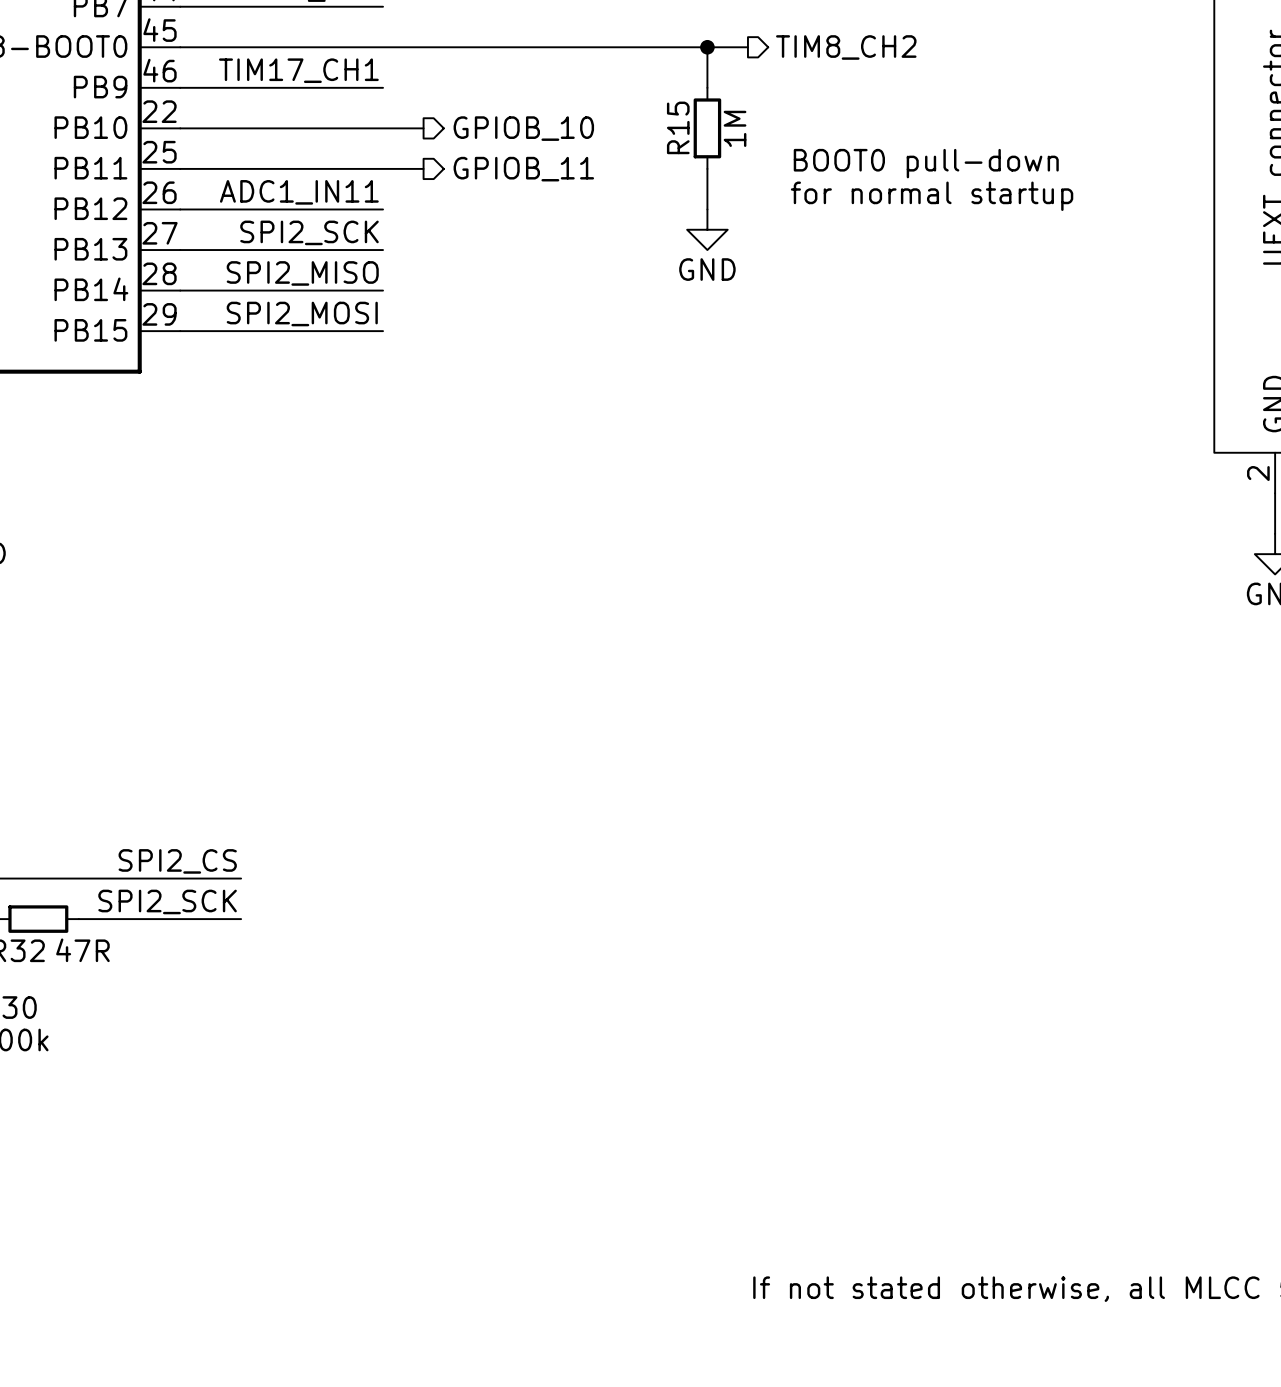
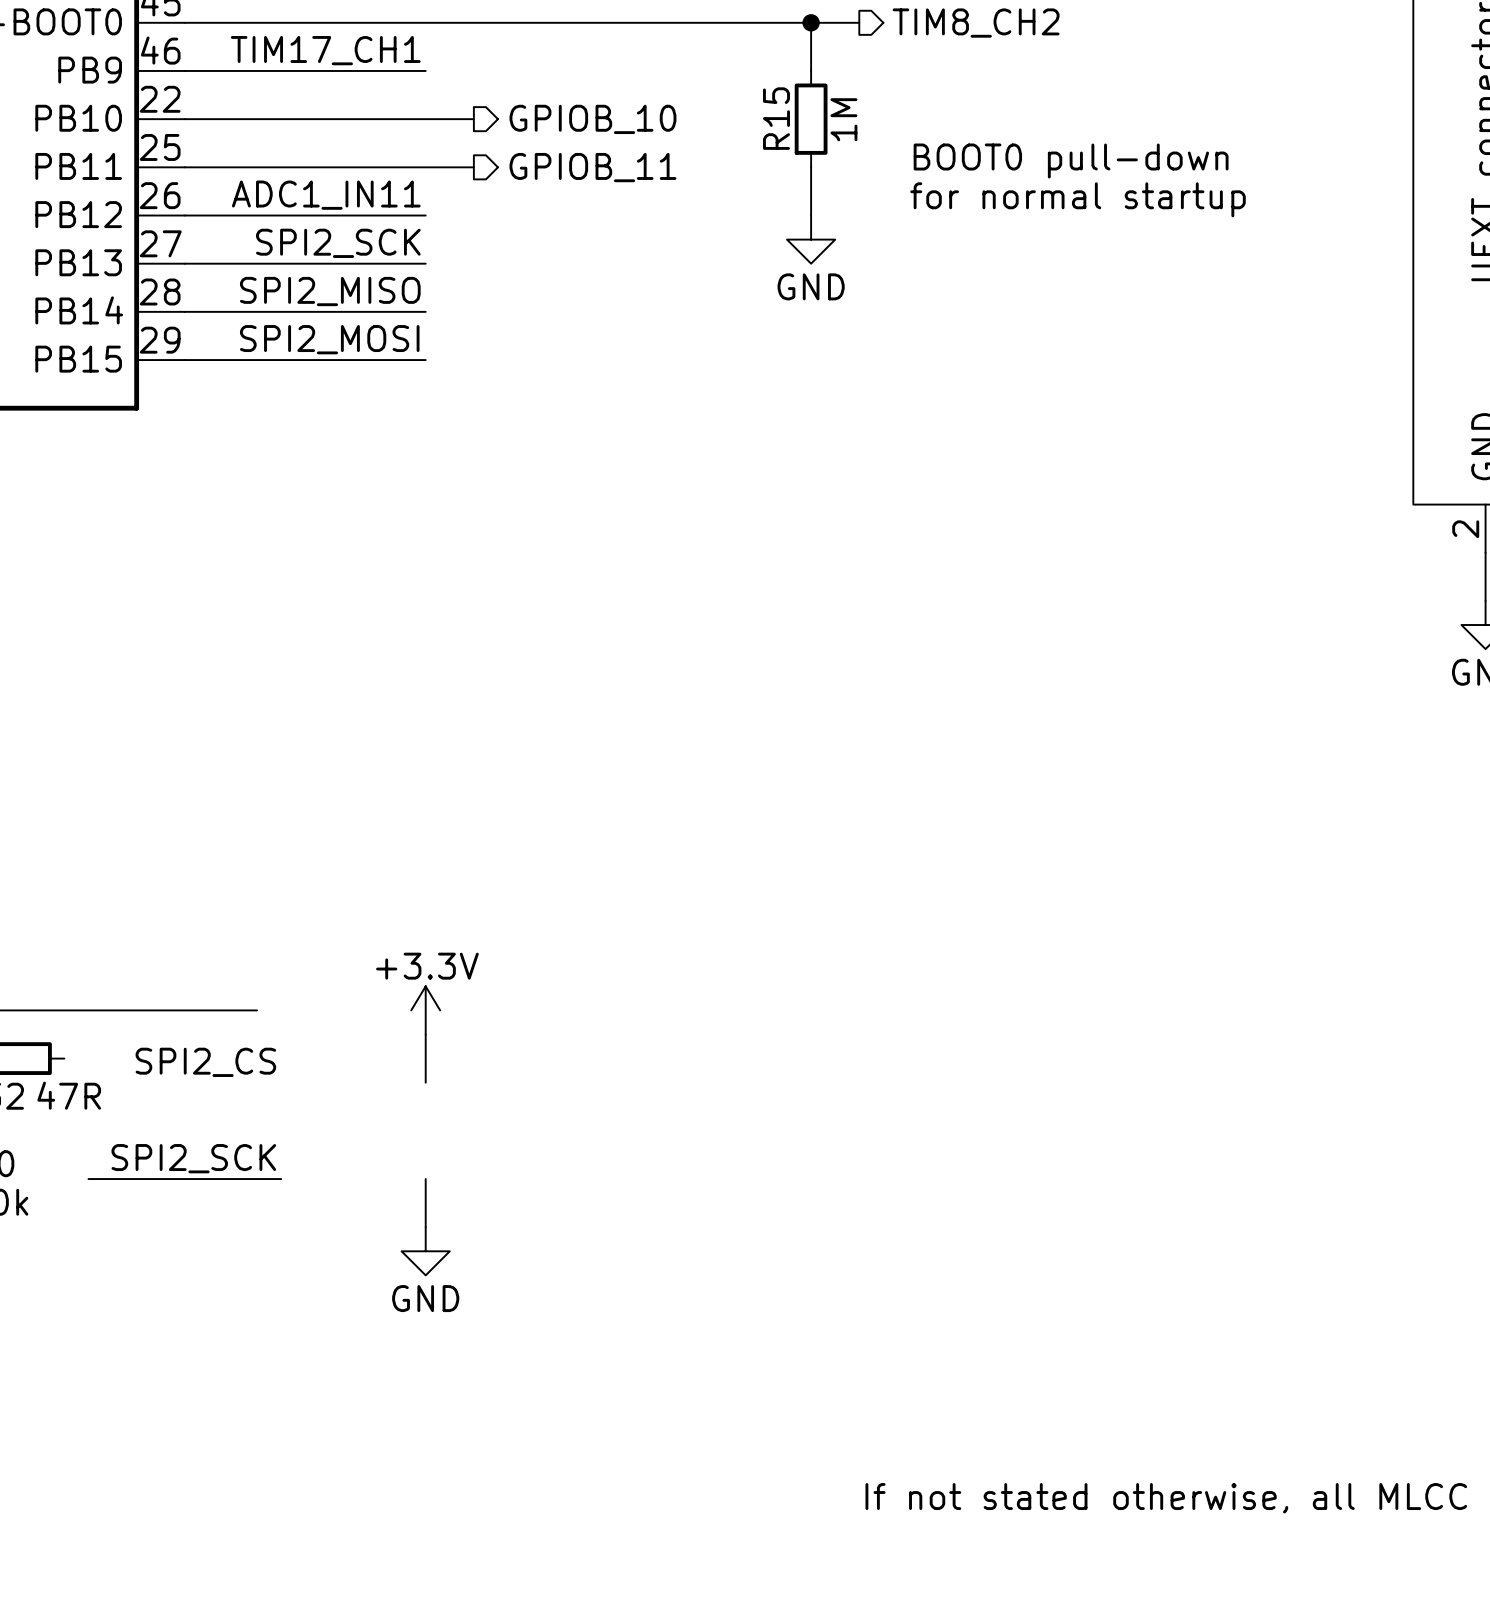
label position: SPI2_CS (177, 861) -> SPI2_CS (205, 1062)
power symbol: none -> +3.3V (425, 1010)
wire: none -> (425, 1034) (425, 1082)
label position: SPI2_SCK (167, 901) -> SPI2_SCK (193, 1158)
wire: (78, 919) (241, 919) -> (88, 1179) (281, 1179)
wire: none -> (425, 1179) (425, 1227)
power symbol: none -> GND (425, 1251)

